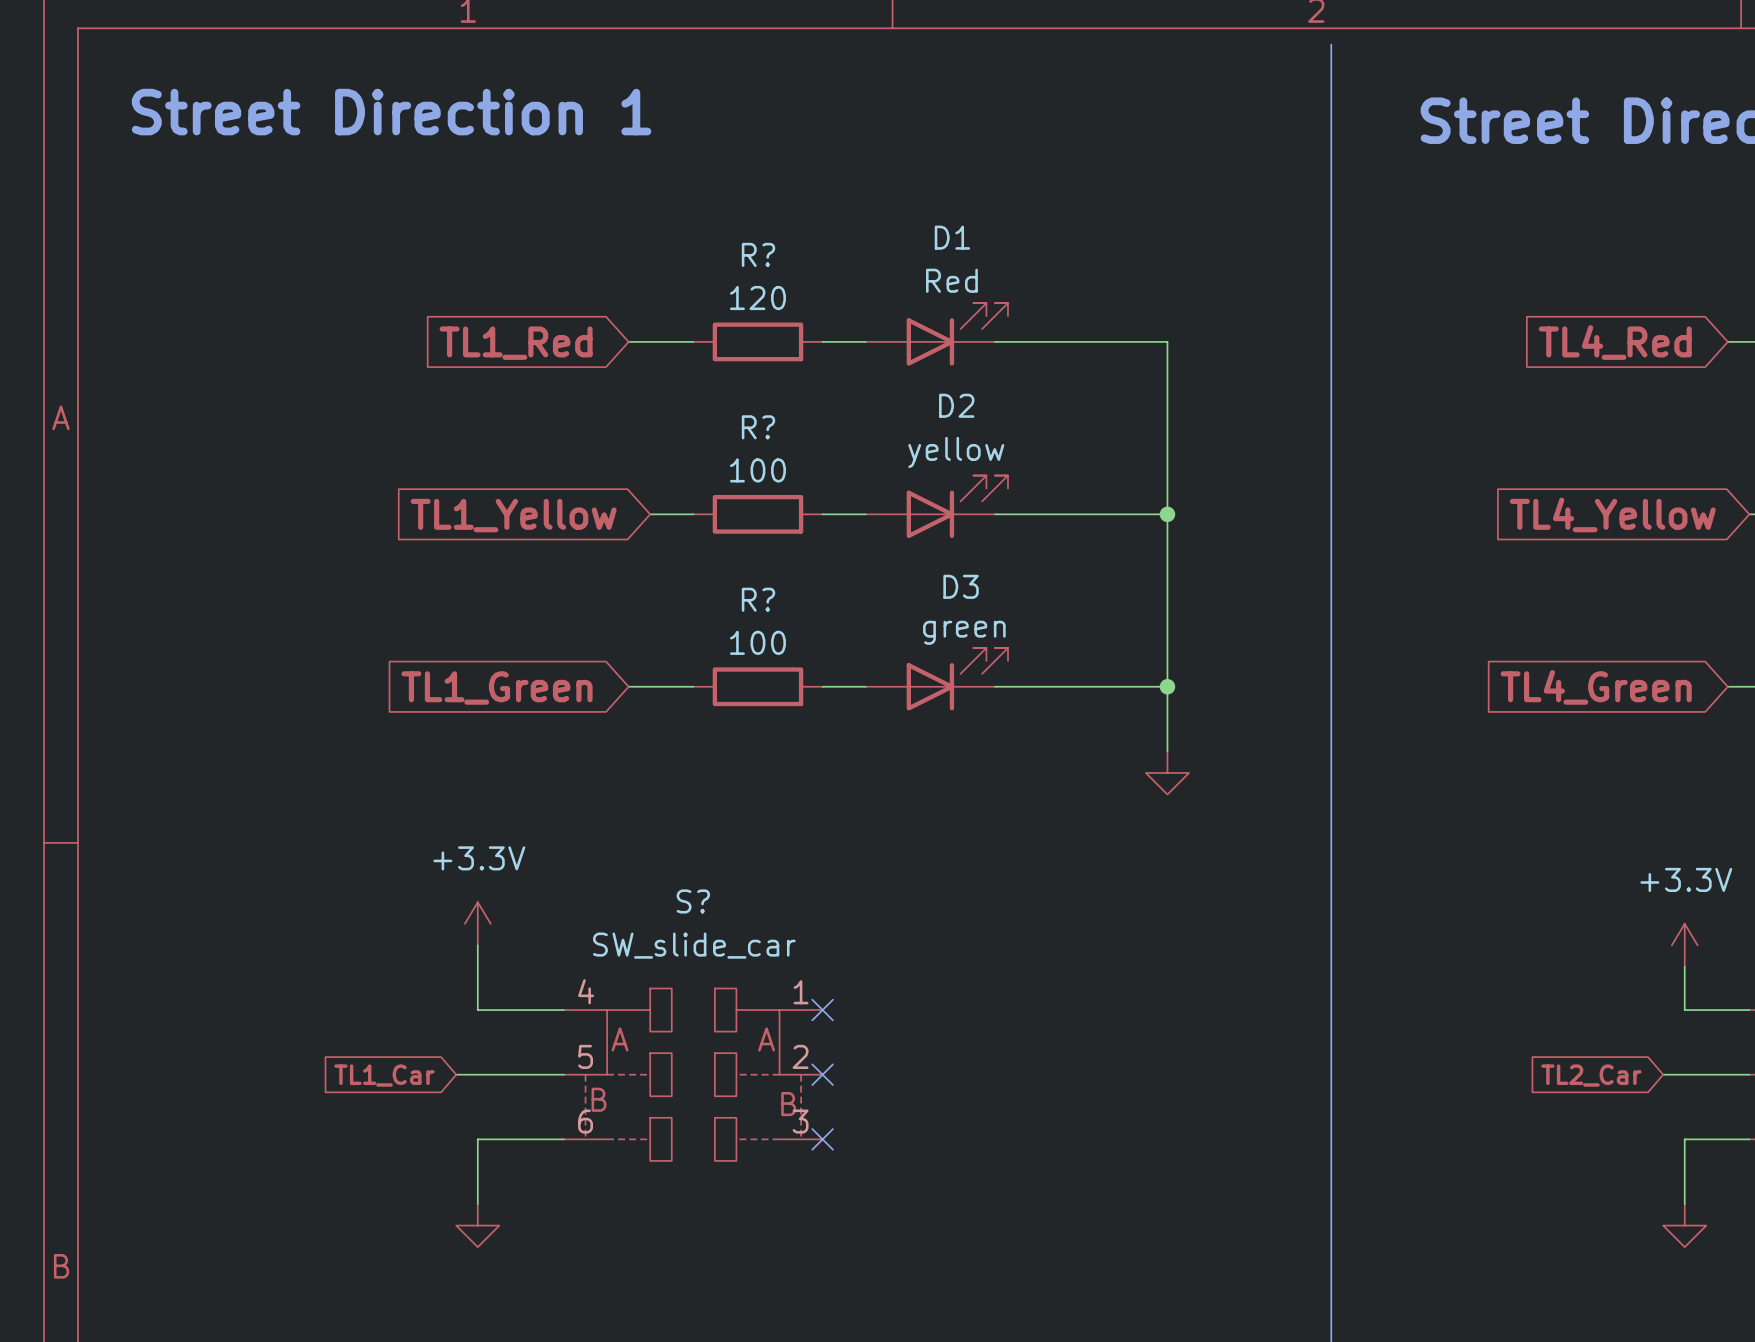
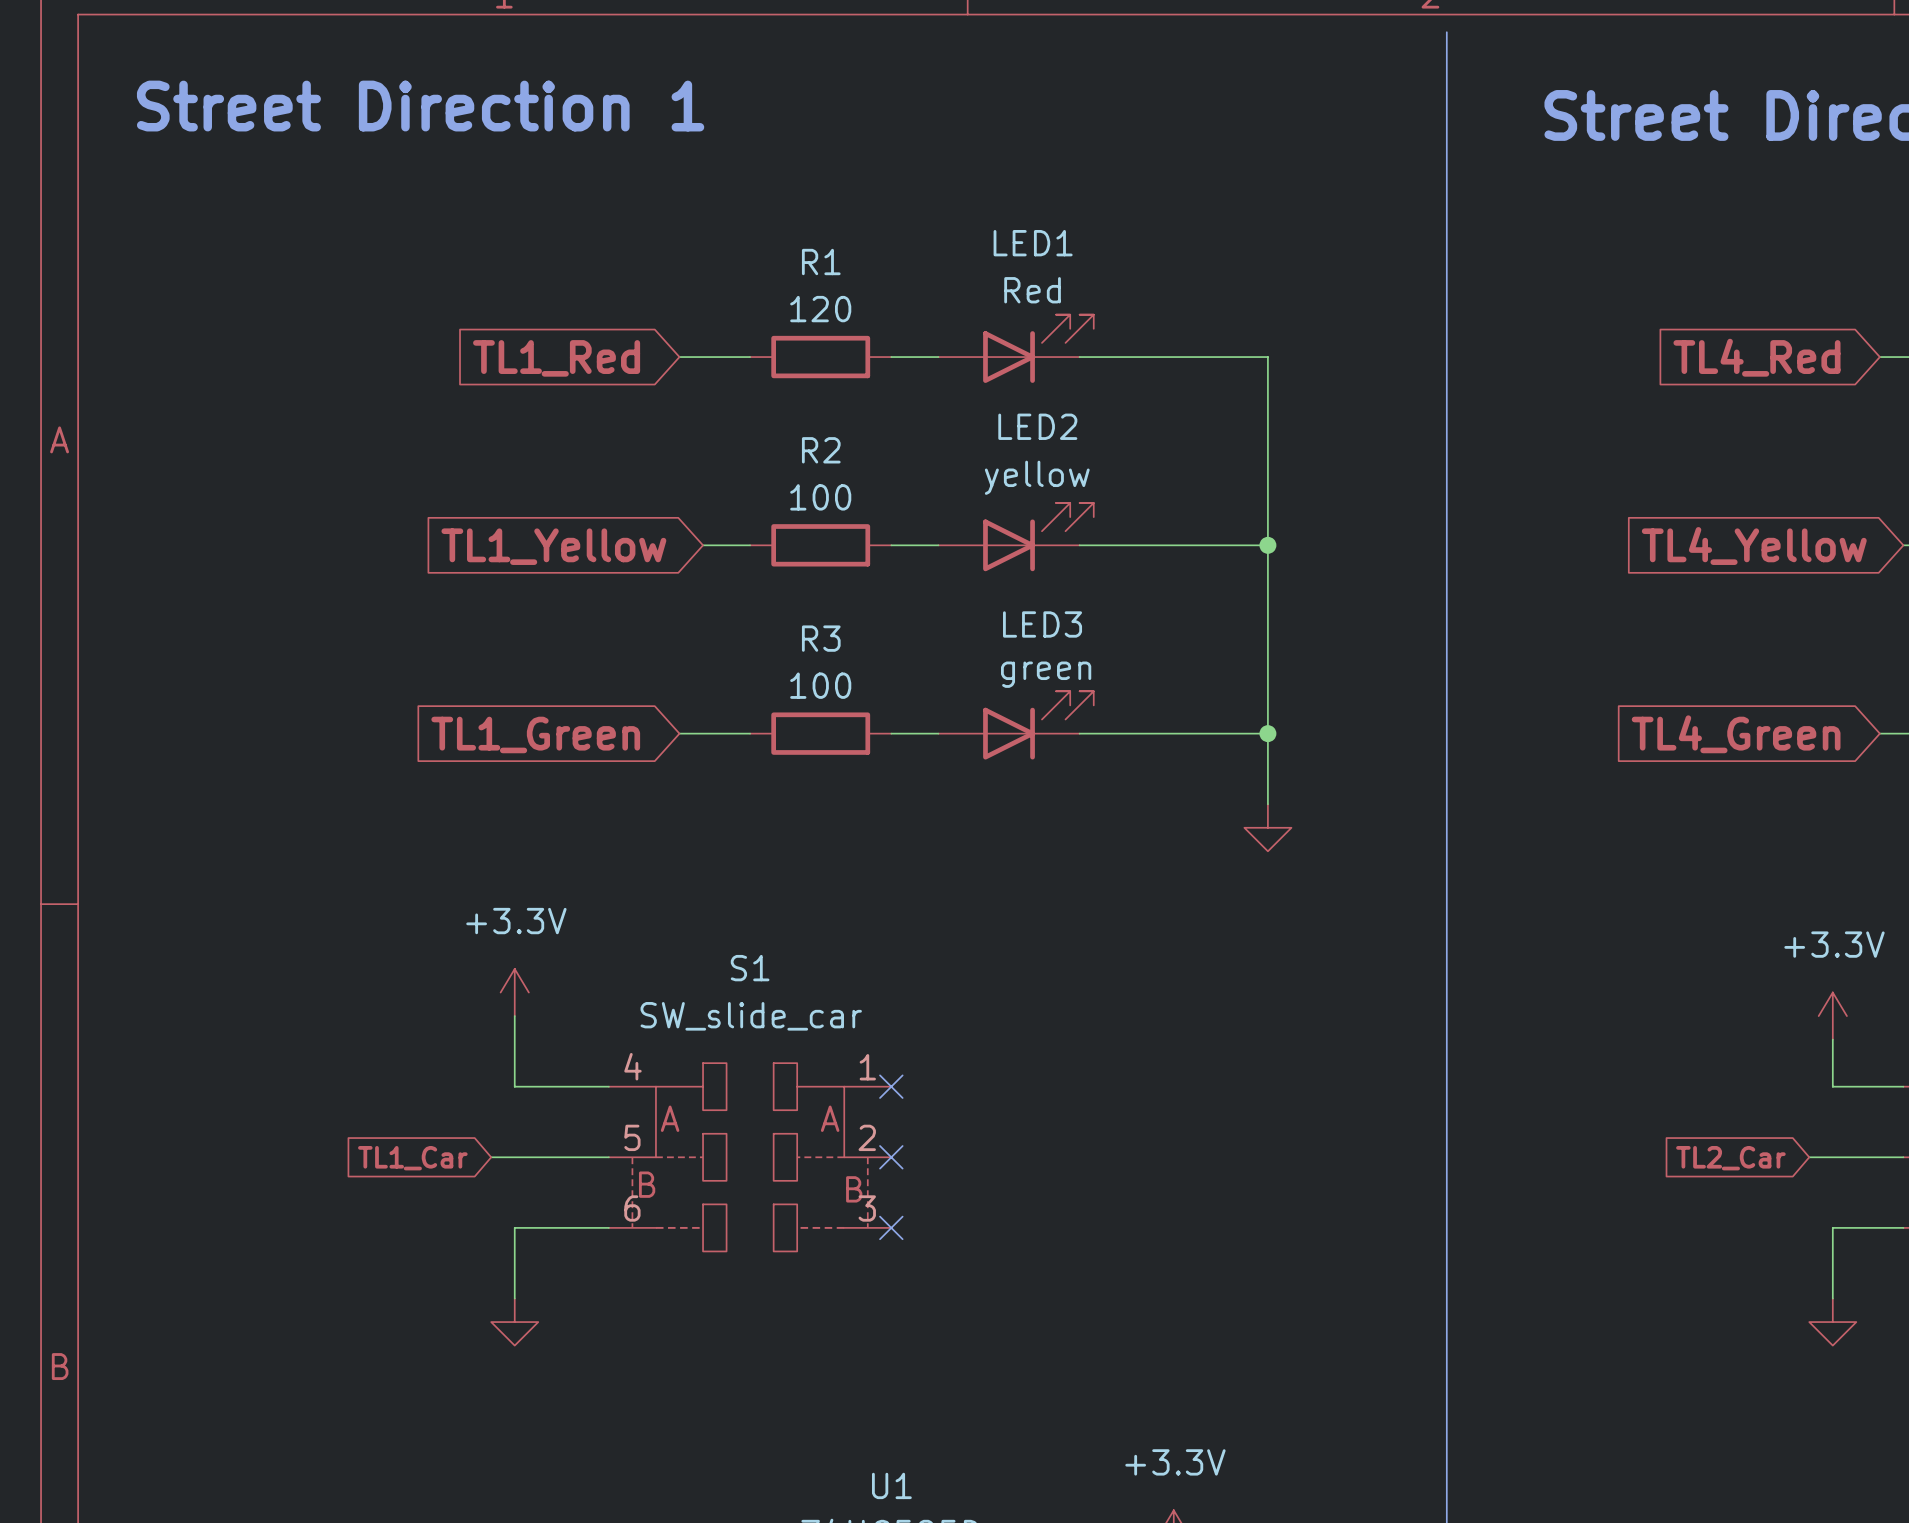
D1 name: D1 (952, 237) -> LED1 (1033, 243)
R? name: R? (758, 254) -> R1 (821, 262)
D2 name: D2 (956, 405) -> LED2 (1037, 426)
R? name: R? (758, 427) -> R2 (821, 450)
D3 name: D3 (961, 586) -> LED3 (1042, 624)
R? name: R? (758, 599) -> R3 (821, 638)
S? name: S? (693, 901) -> S1 (750, 968)

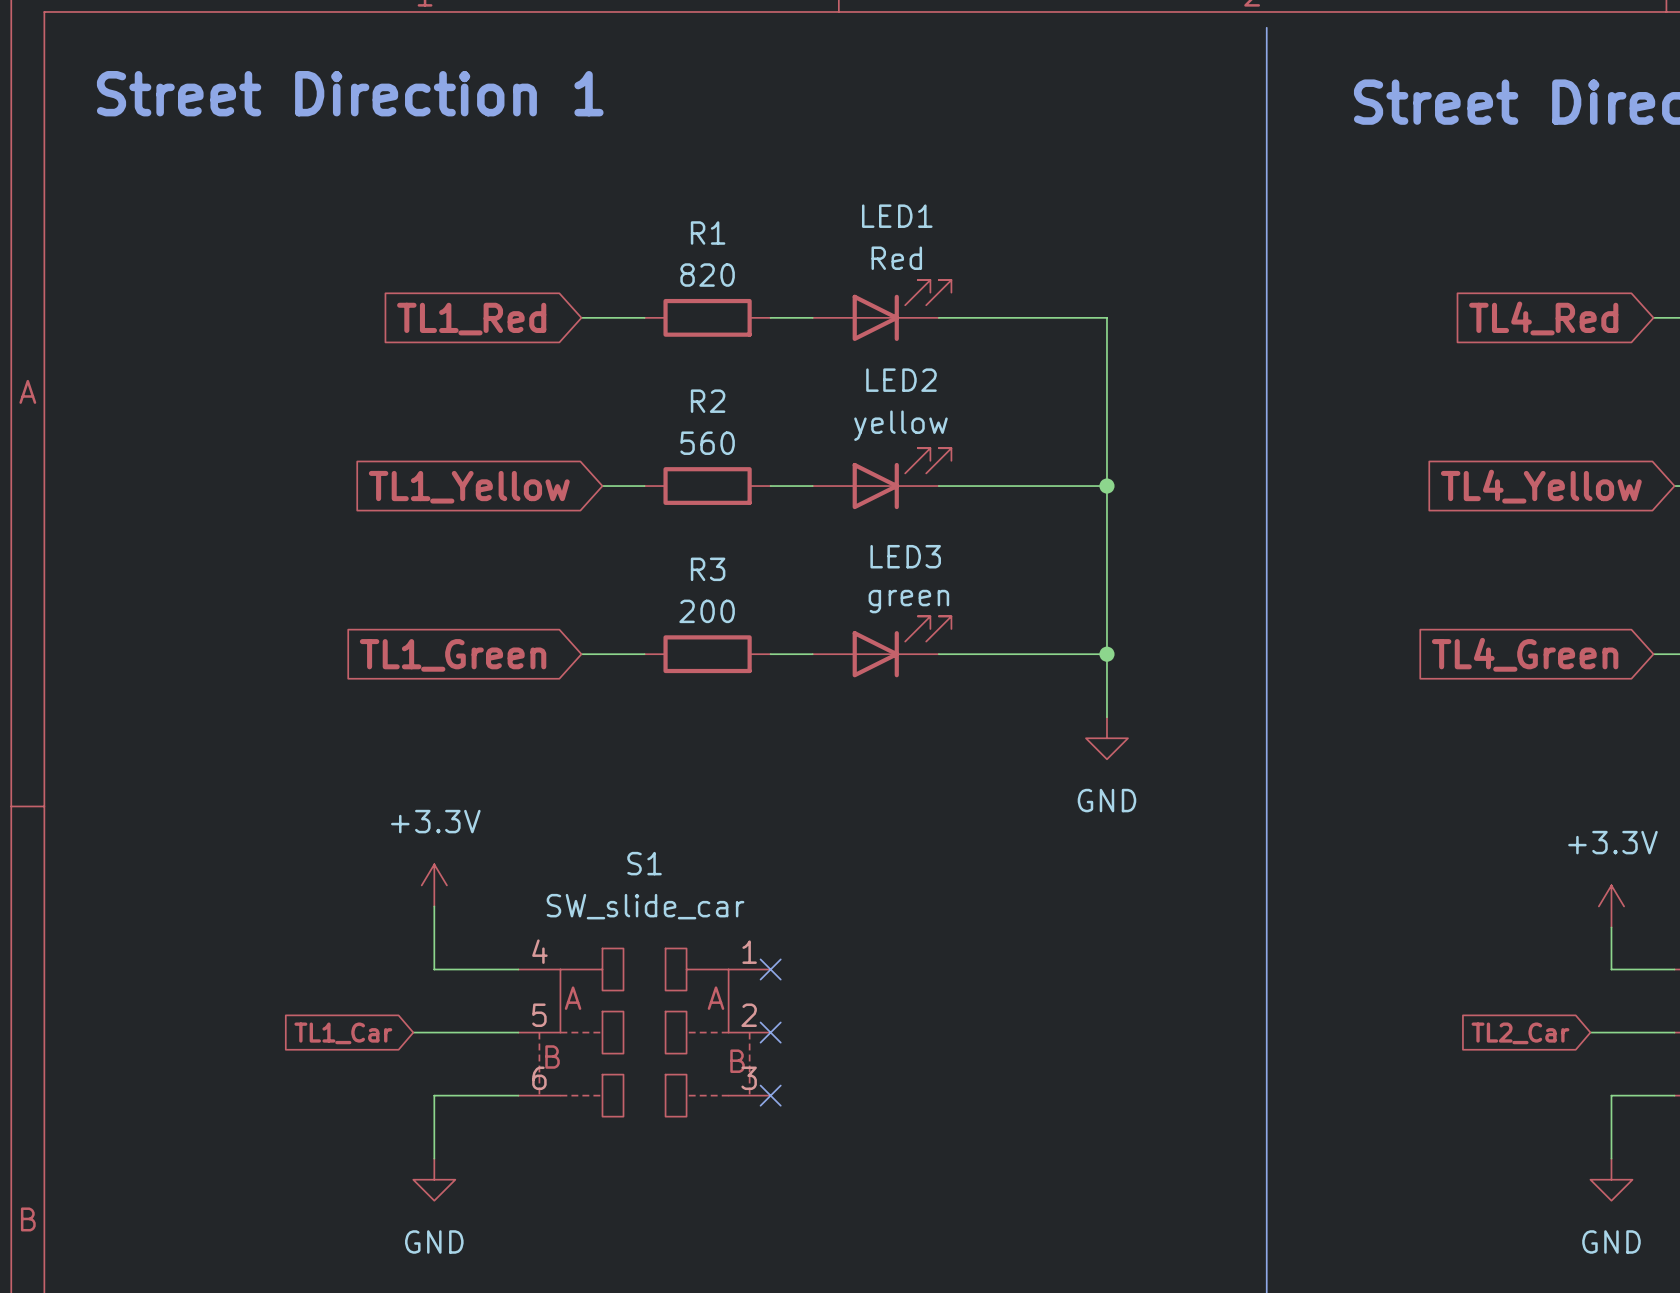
R1 value: 120 (820, 309) -> 820 (707, 275)
R2 value: 100 (820, 497) -> 560 (707, 443)
R3 value: 100 (820, 685) -> 200 (707, 611)
power symbol text: none -> GND (1106, 800)
power symbol text: none -> GND (434, 1241)
power symbol text: none -> GND (1611, 1241)

